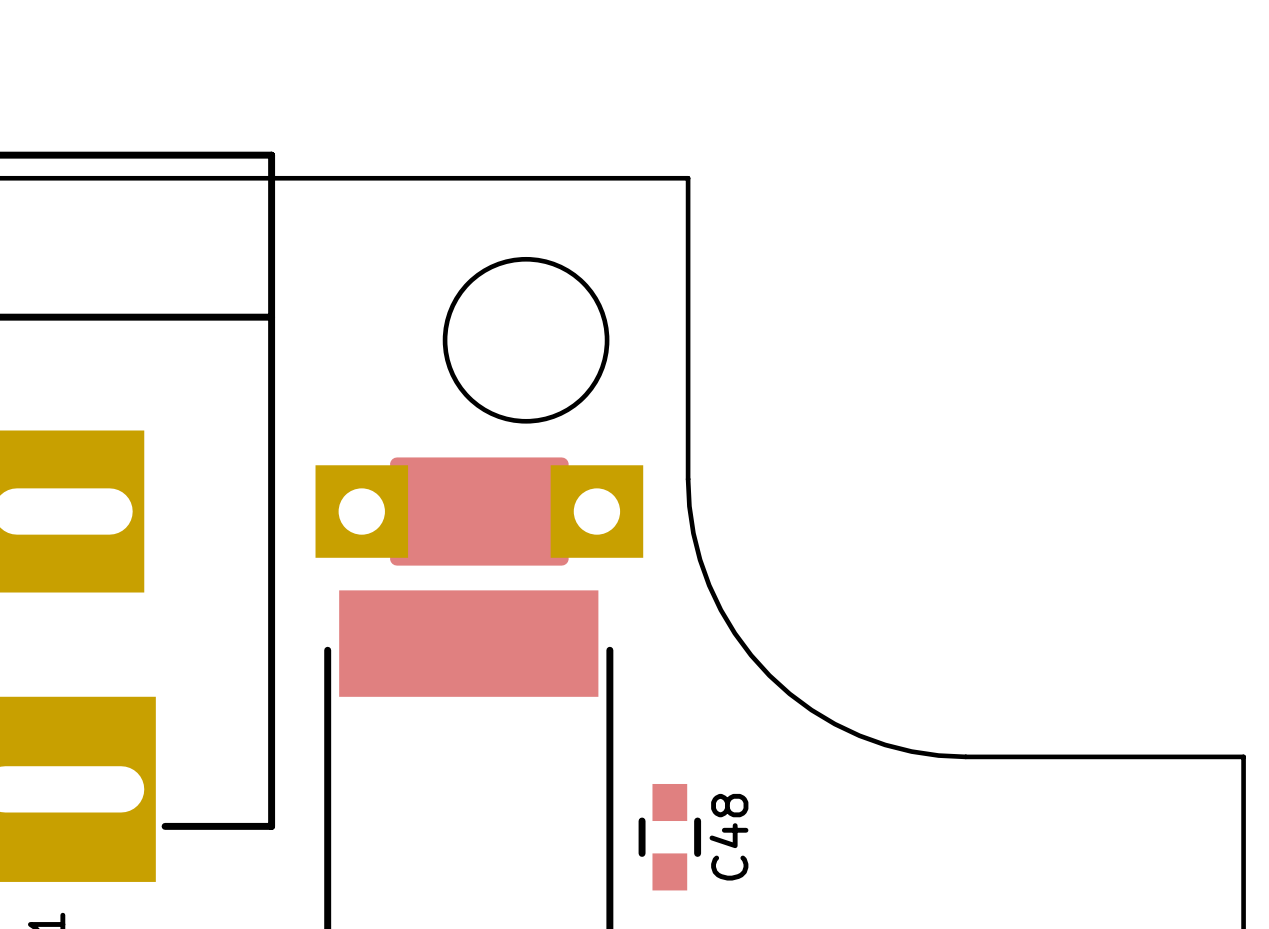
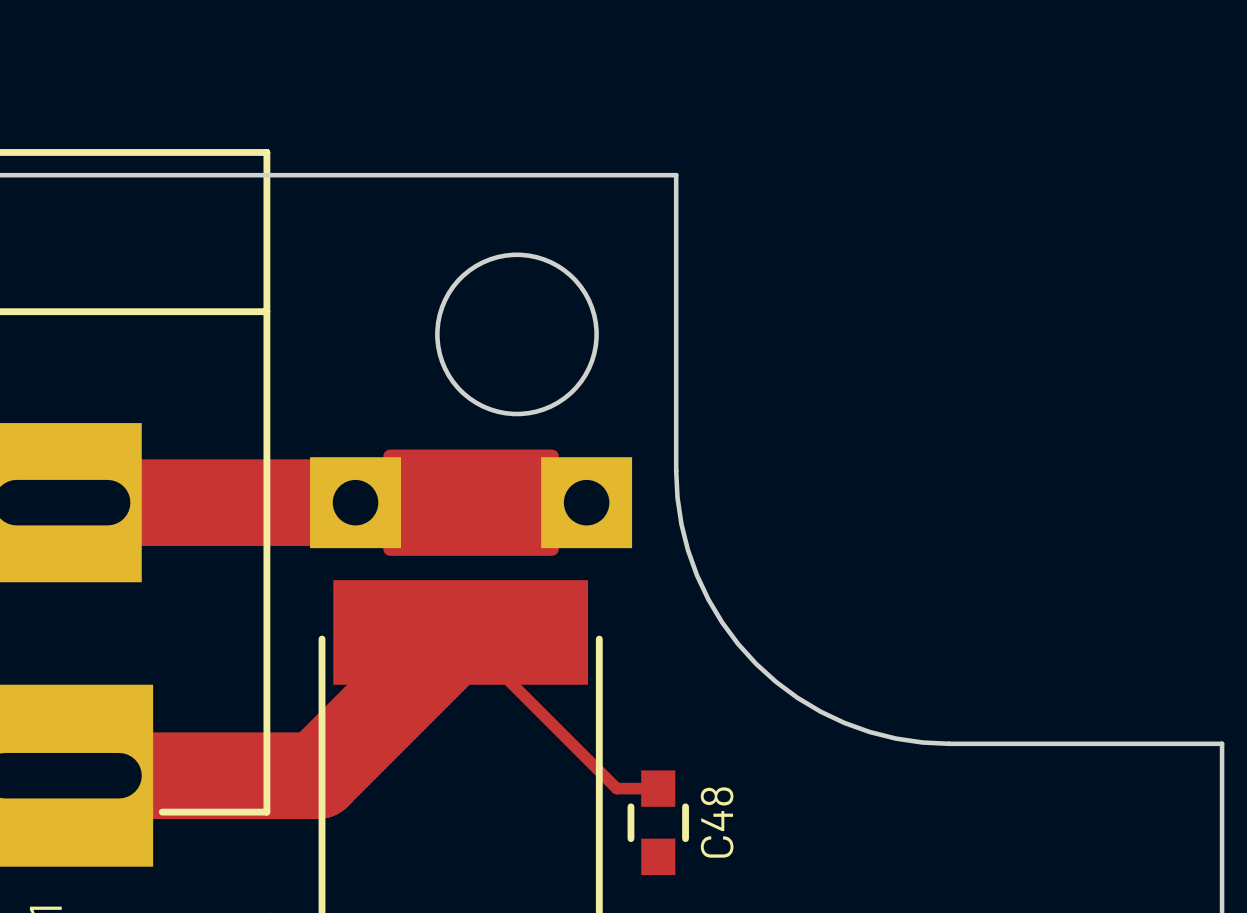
track: none -> (62, 502) (355, 502)
track: none -> (62, 775) (317, 775) (460, 632) (616, 788) (658, 788)

